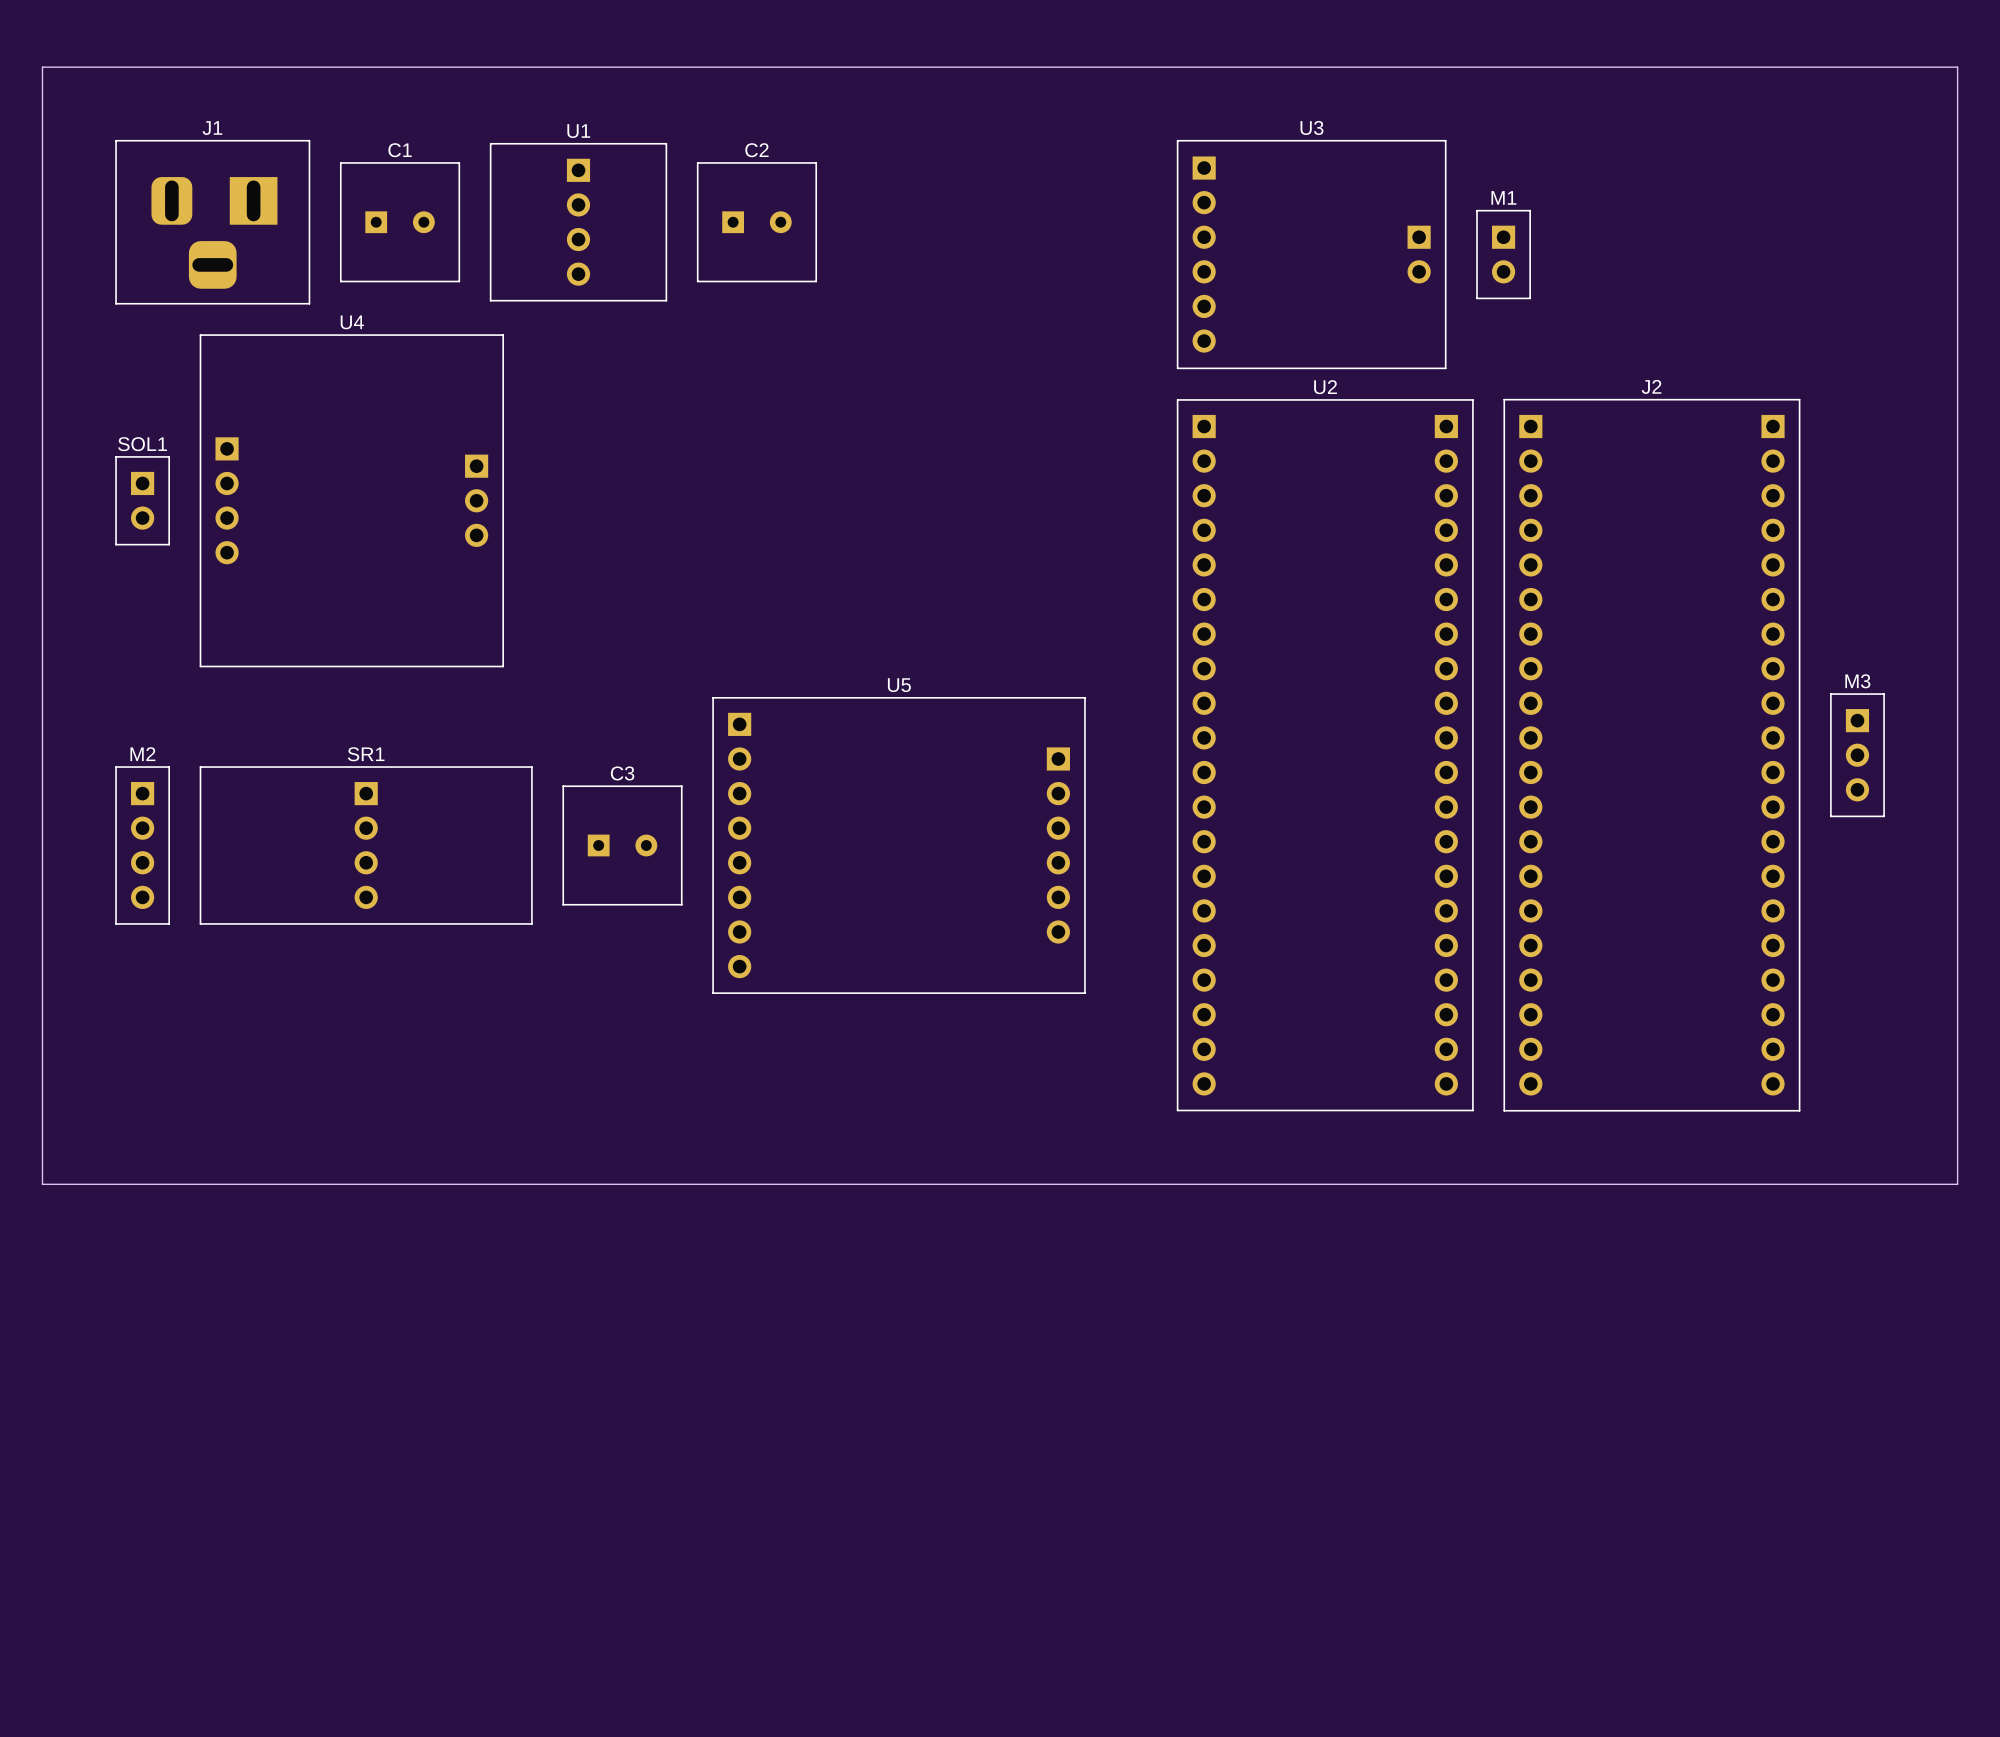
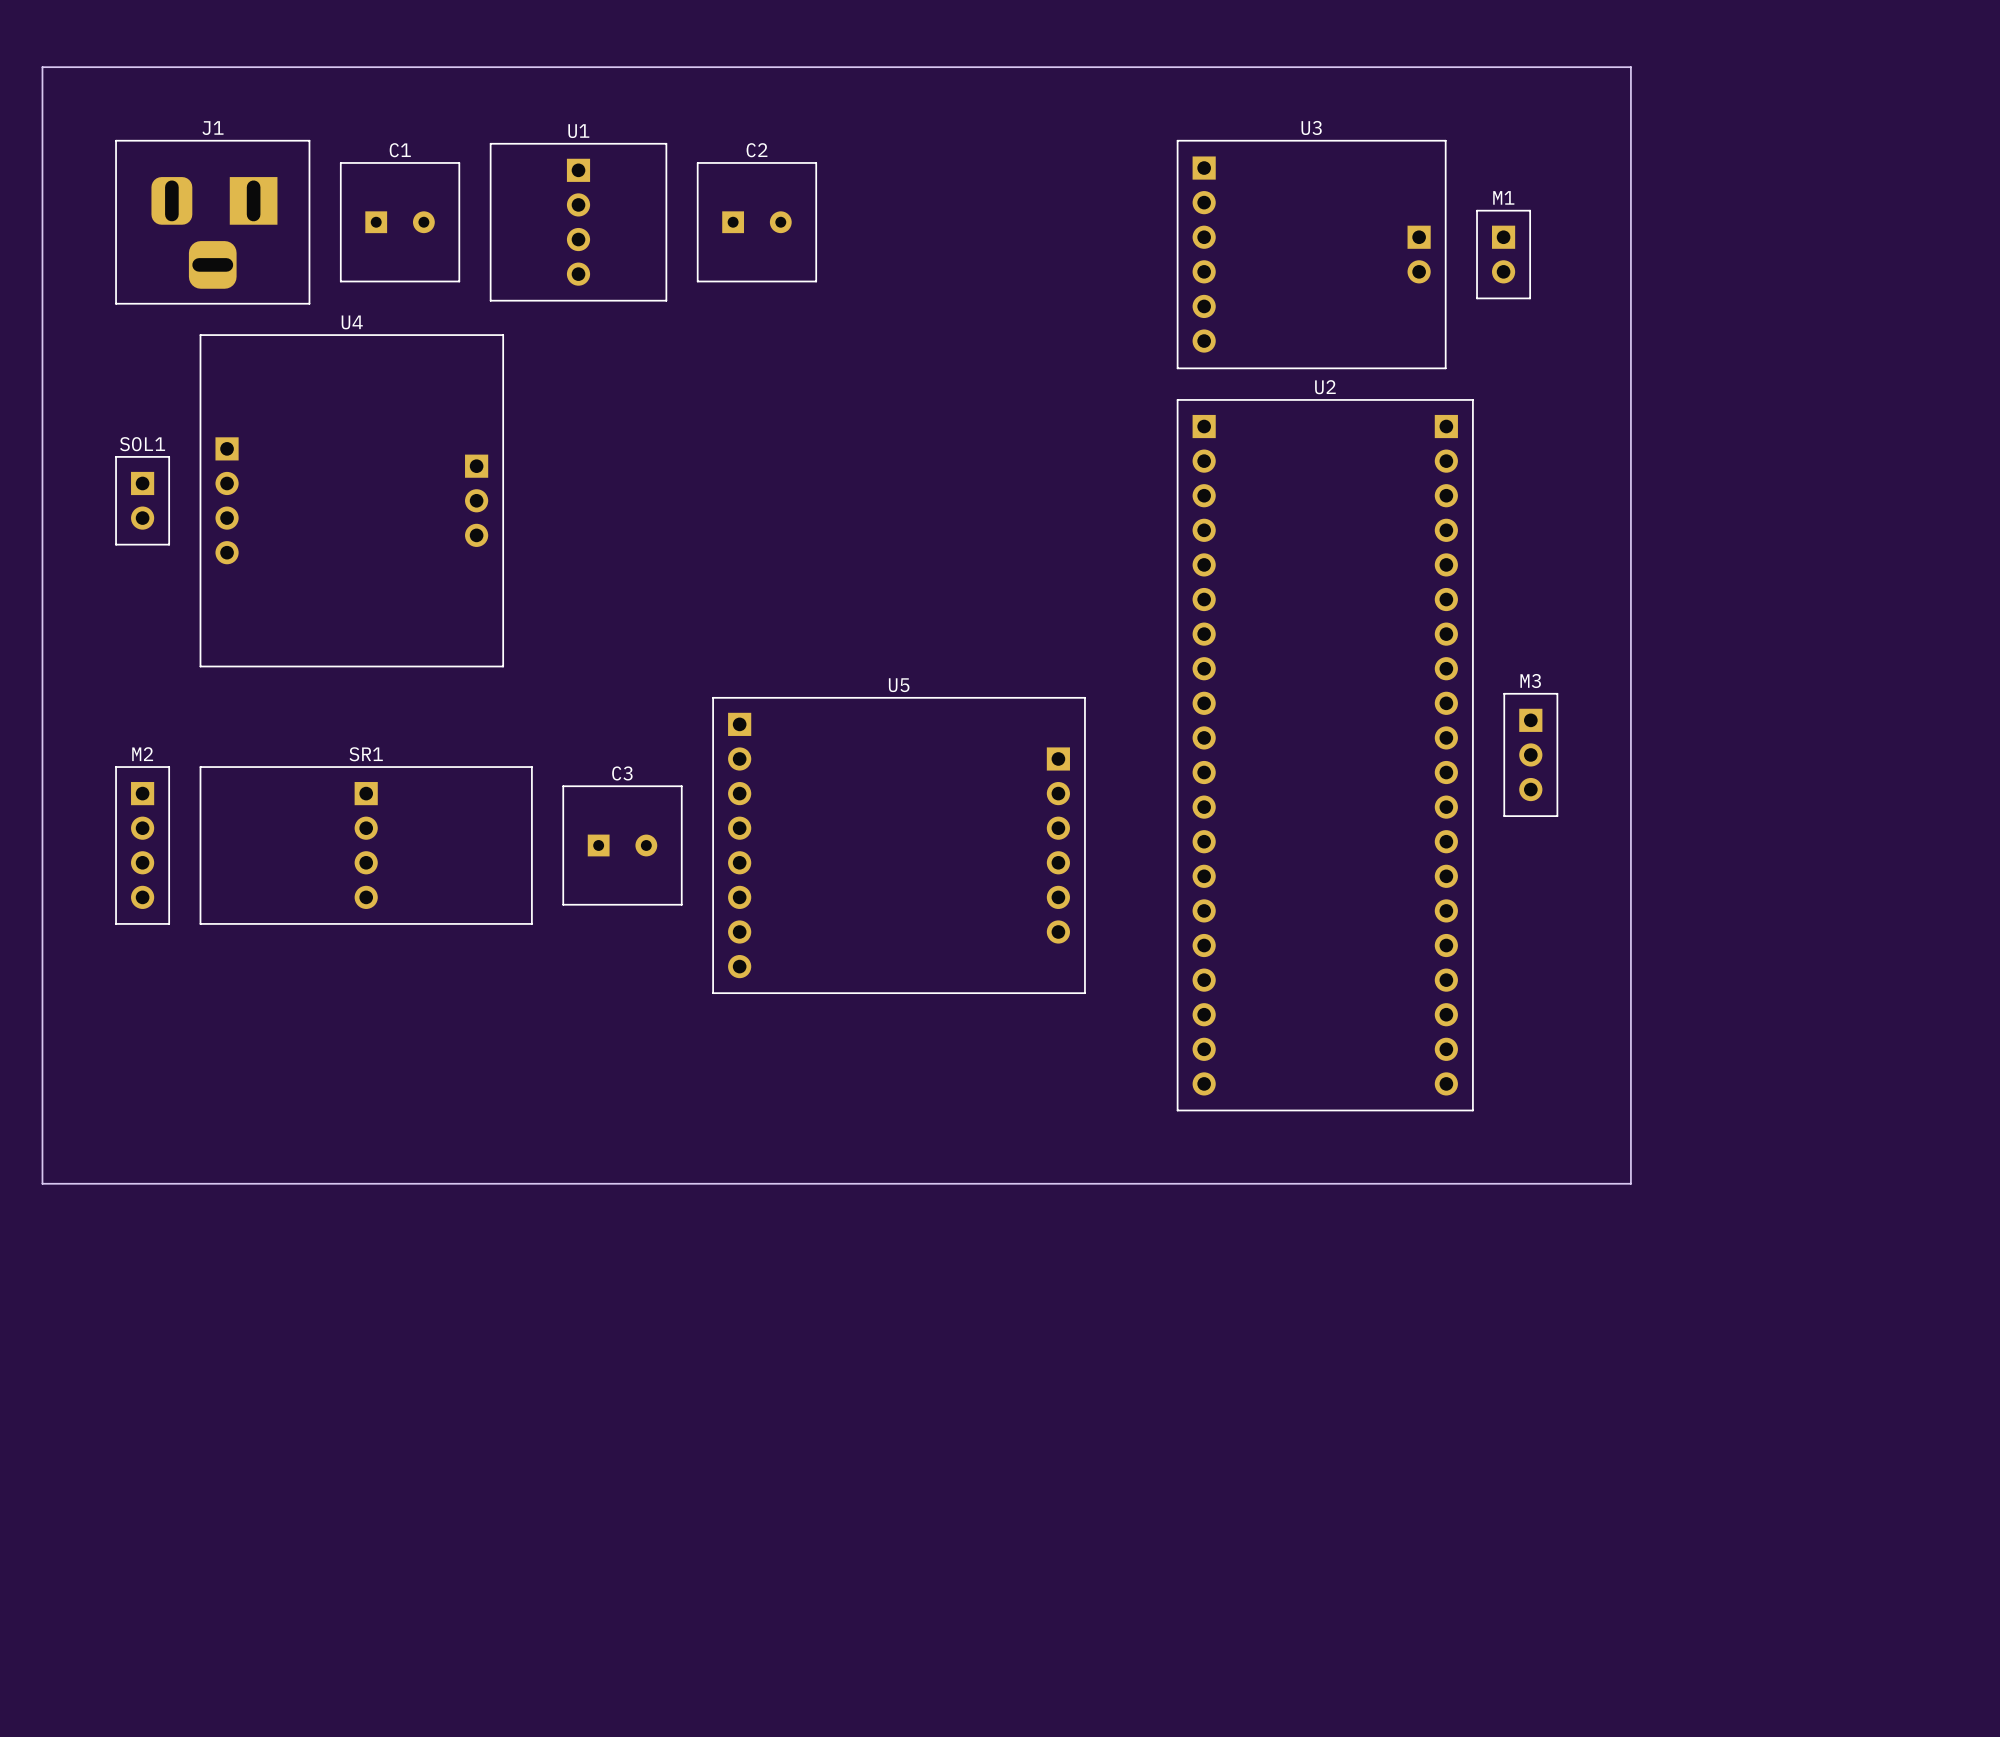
board edge: (1630, 67) (1957, 67) (1957, 1184) (42, 1183) -> (1630, 67) (1630, 1183) (42, 1183)
J2: (1651, 755) -> none
M3 position: (1857, 755) -> (1530, 754)

